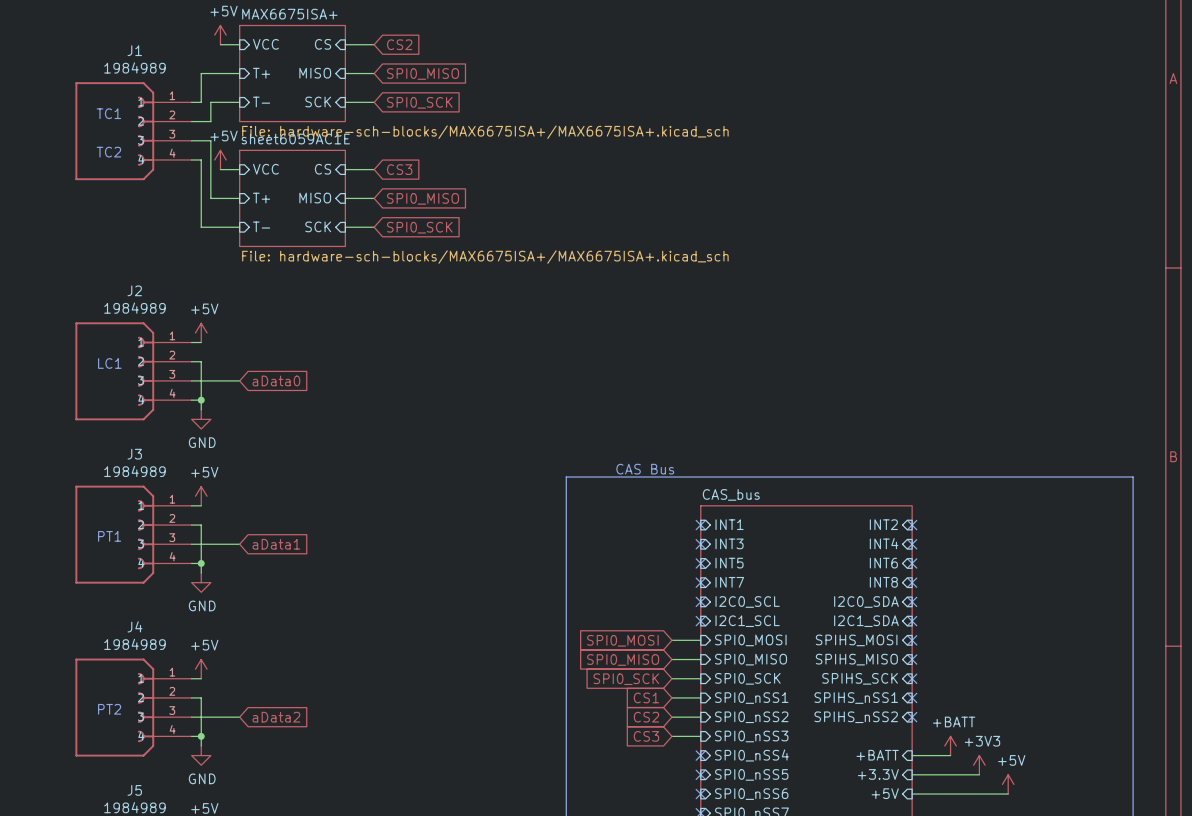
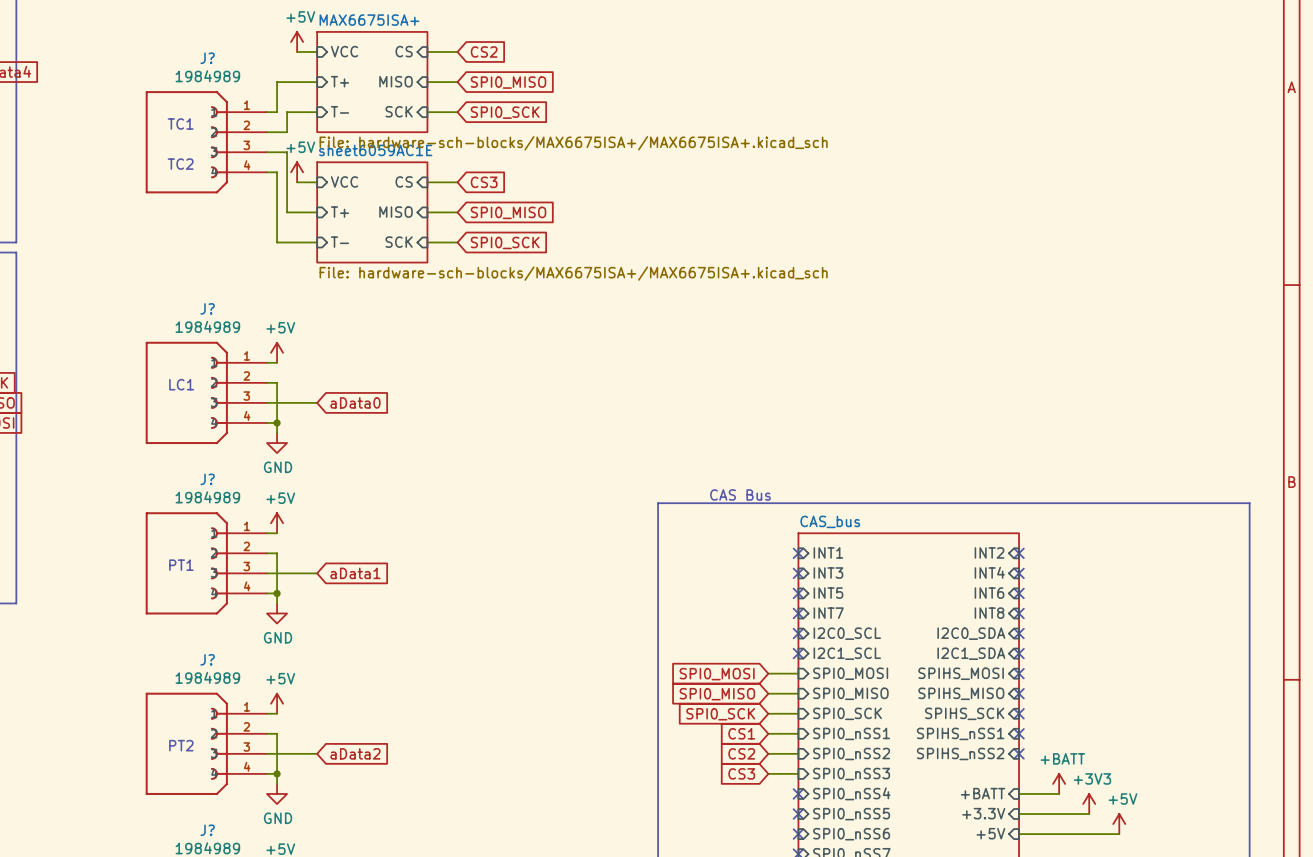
J1 name: J1 (134, 50) -> J? (207, 58)
J2 name: J2 (134, 290) -> J? (207, 308)
J3 name: J3 (134, 454) -> J? (207, 479)
J4 name: J4 (134, 626) -> J? (207, 659)
J5 name: J5 (134, 790) -> J? (207, 830)

